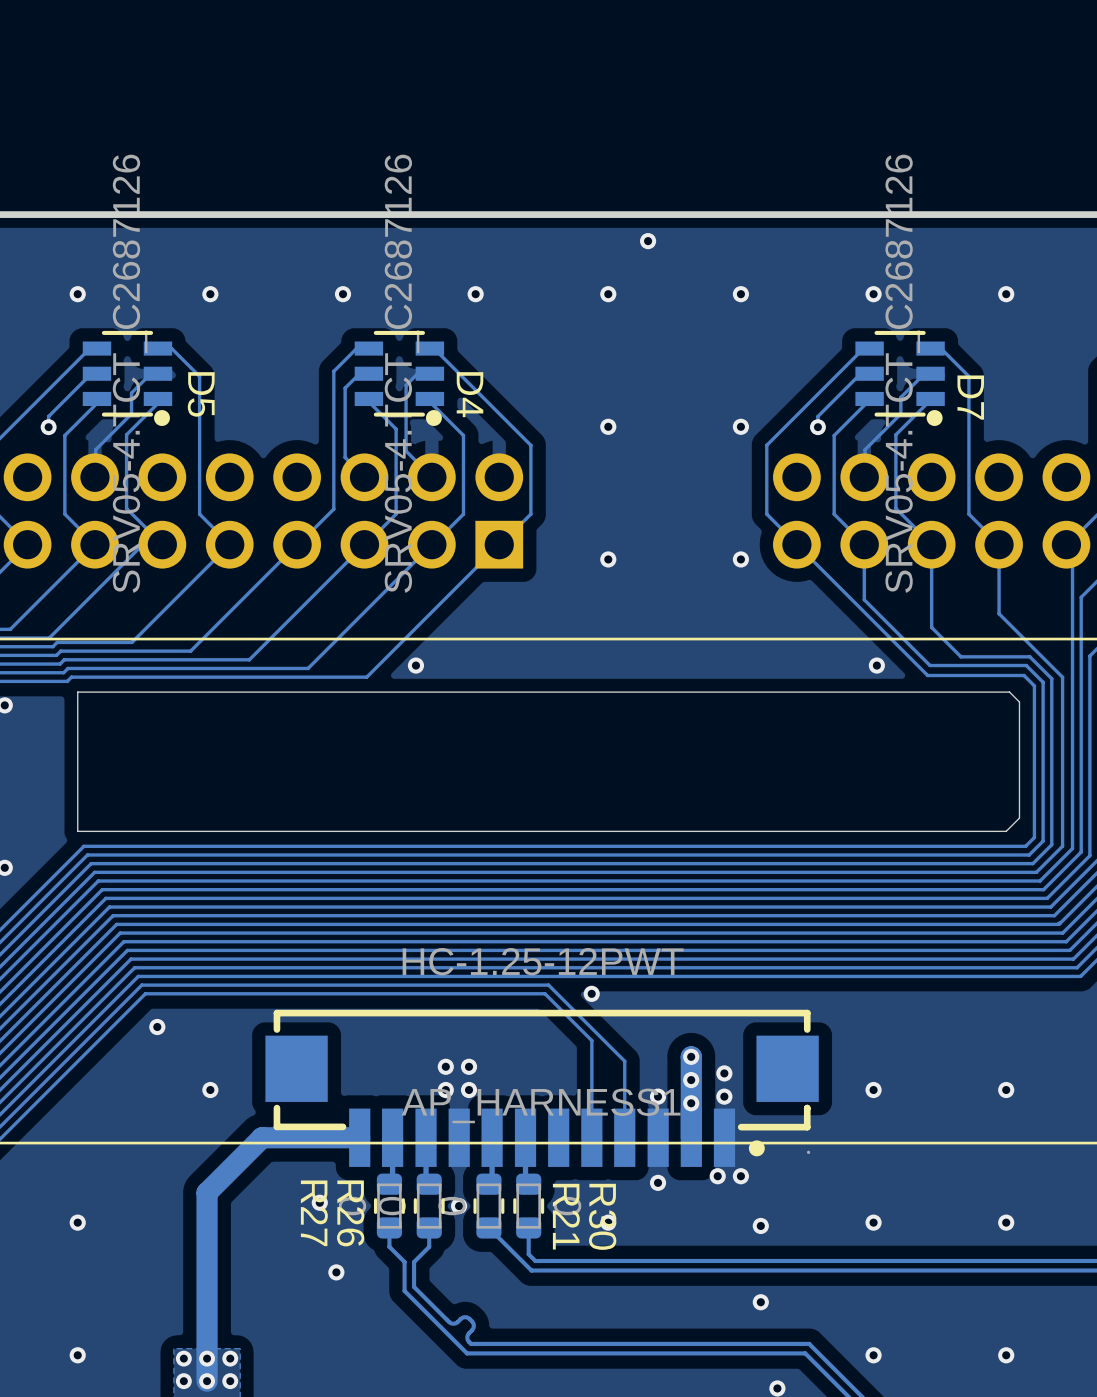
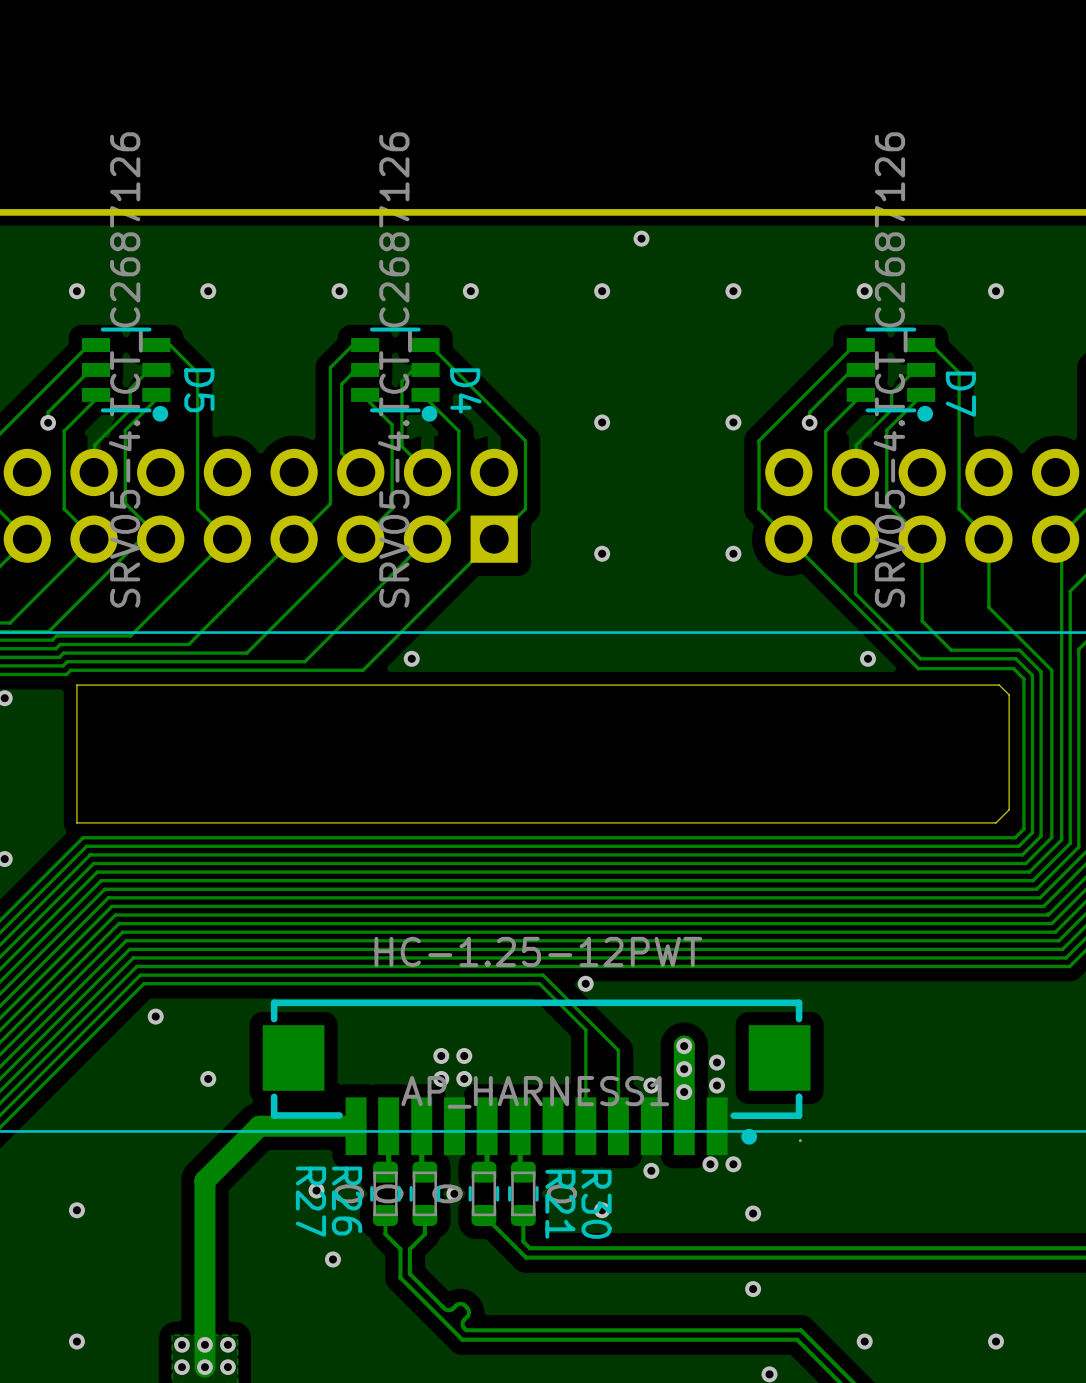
via: (873, 1090) -> none
via: (1006, 1090) -> none
via: (873, 1222) -> none
via: (1006, 1222) -> none

